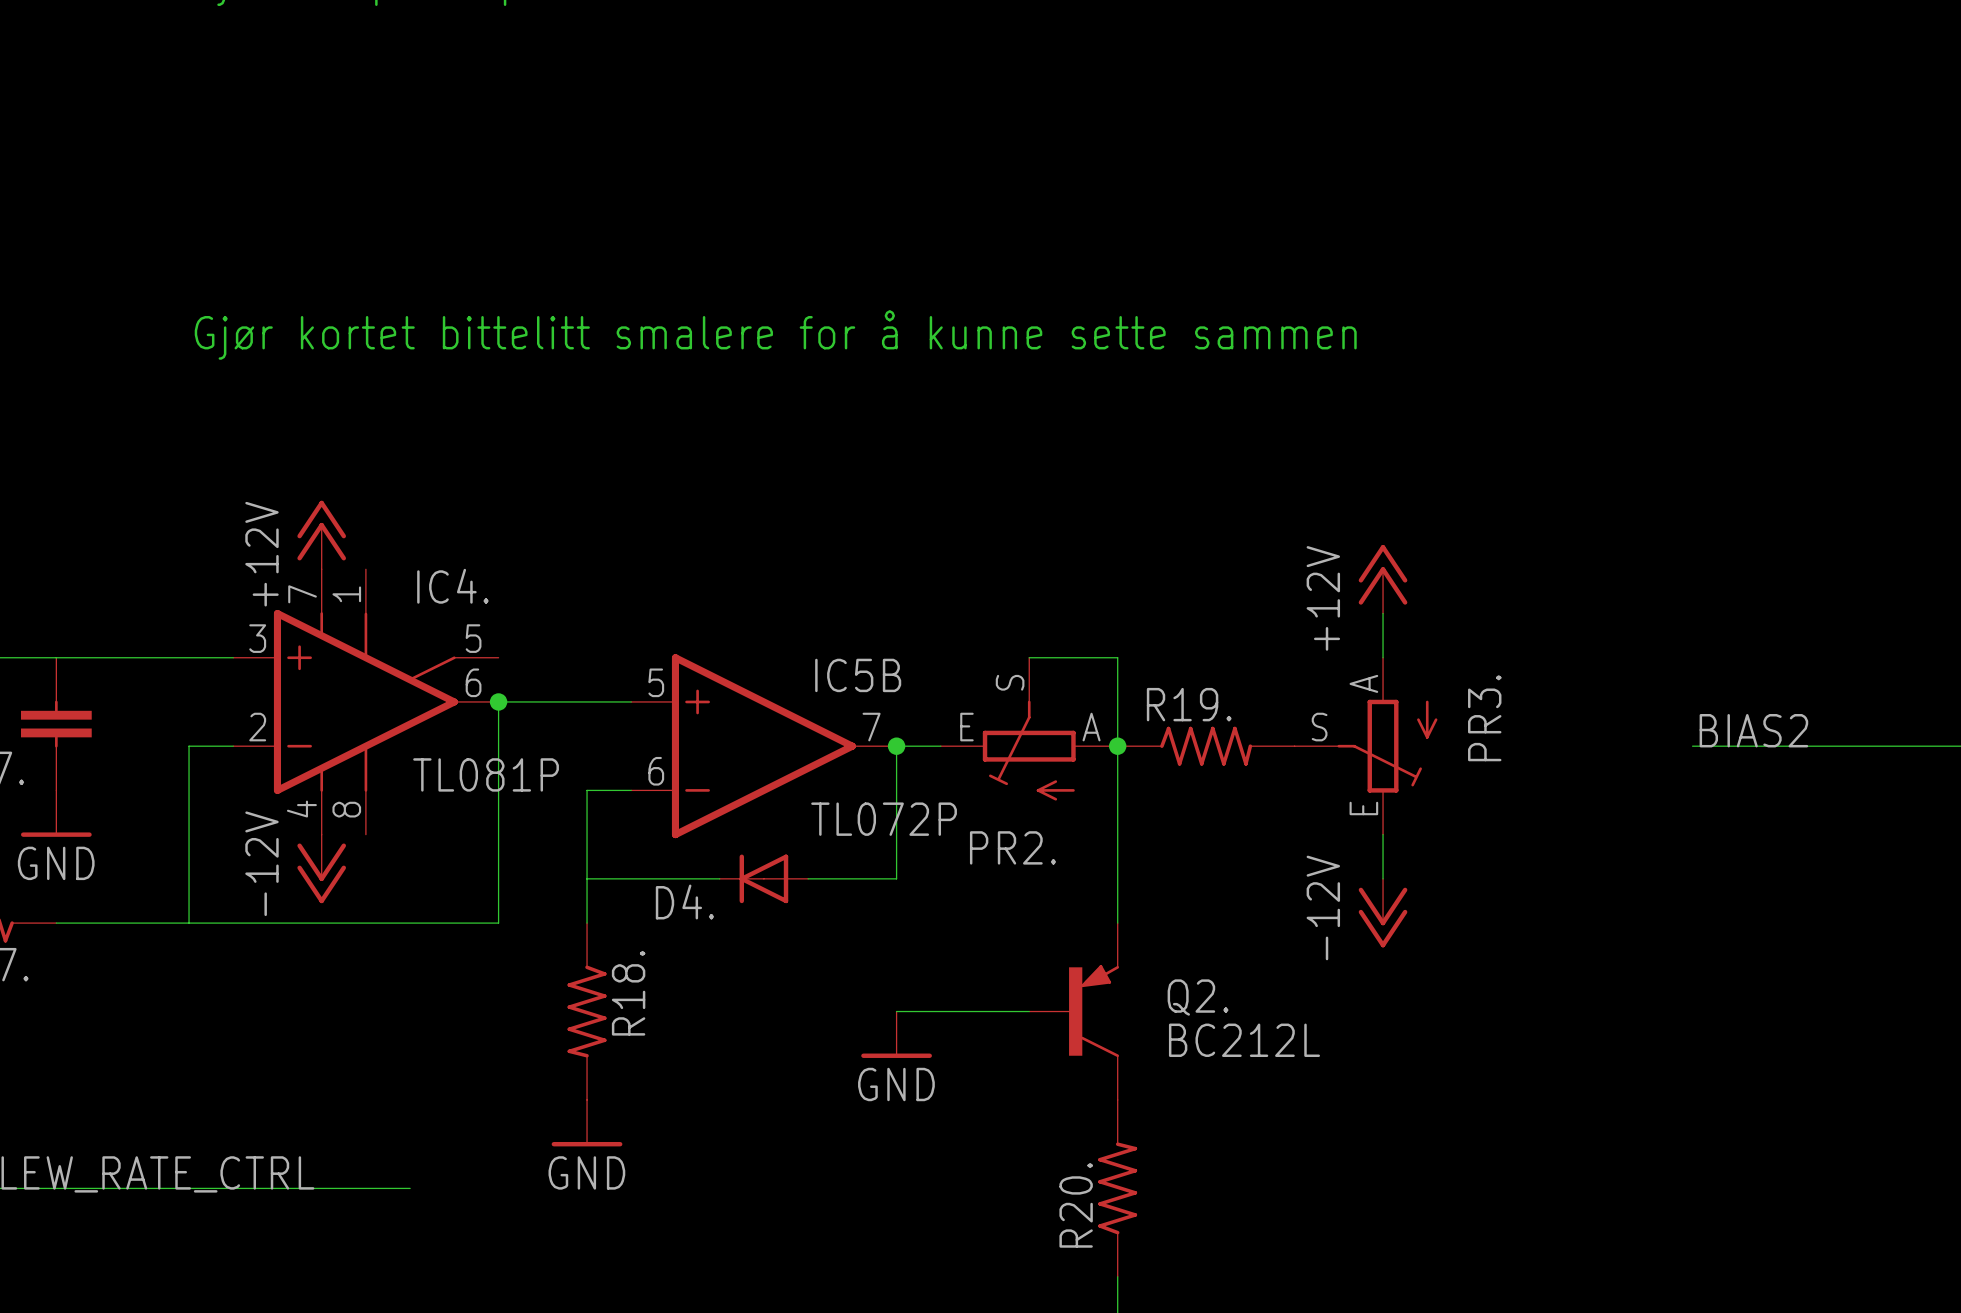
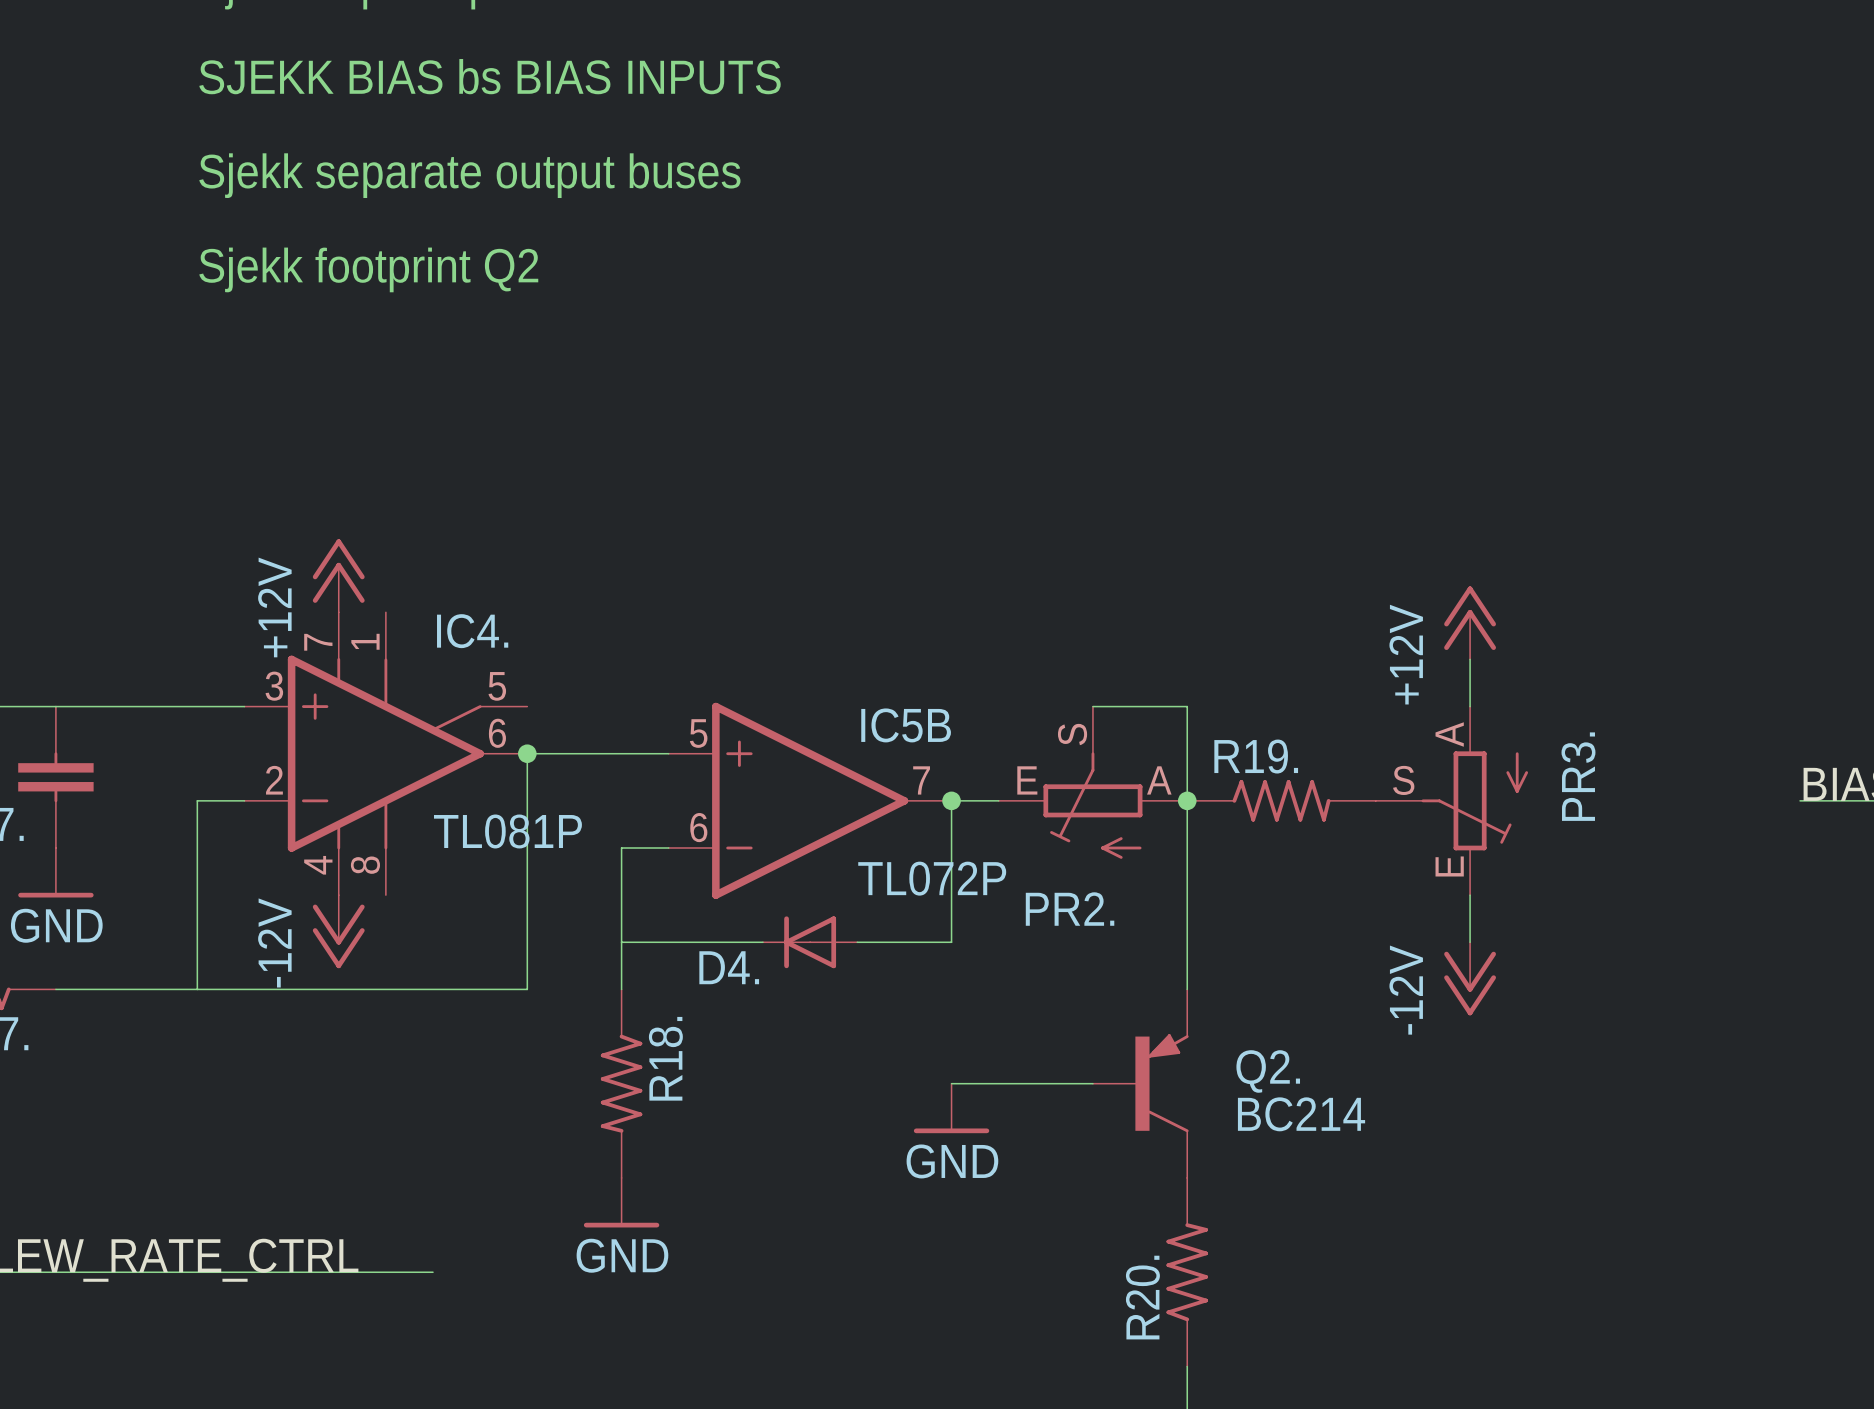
text: none -> SJEKK BIAS bs BIAS INPUTS (489, 76)
text: none -> Sjekk separate output buses (469, 175)
text: none -> Sjekk footprint Q2 (368, 269)
text: Gjør kortet bittelitt smalere for å kunne sette sammen (775, 334) -> none
Q2. value: BC212L (1244, 1040) -> BC214 (1301, 1114)

